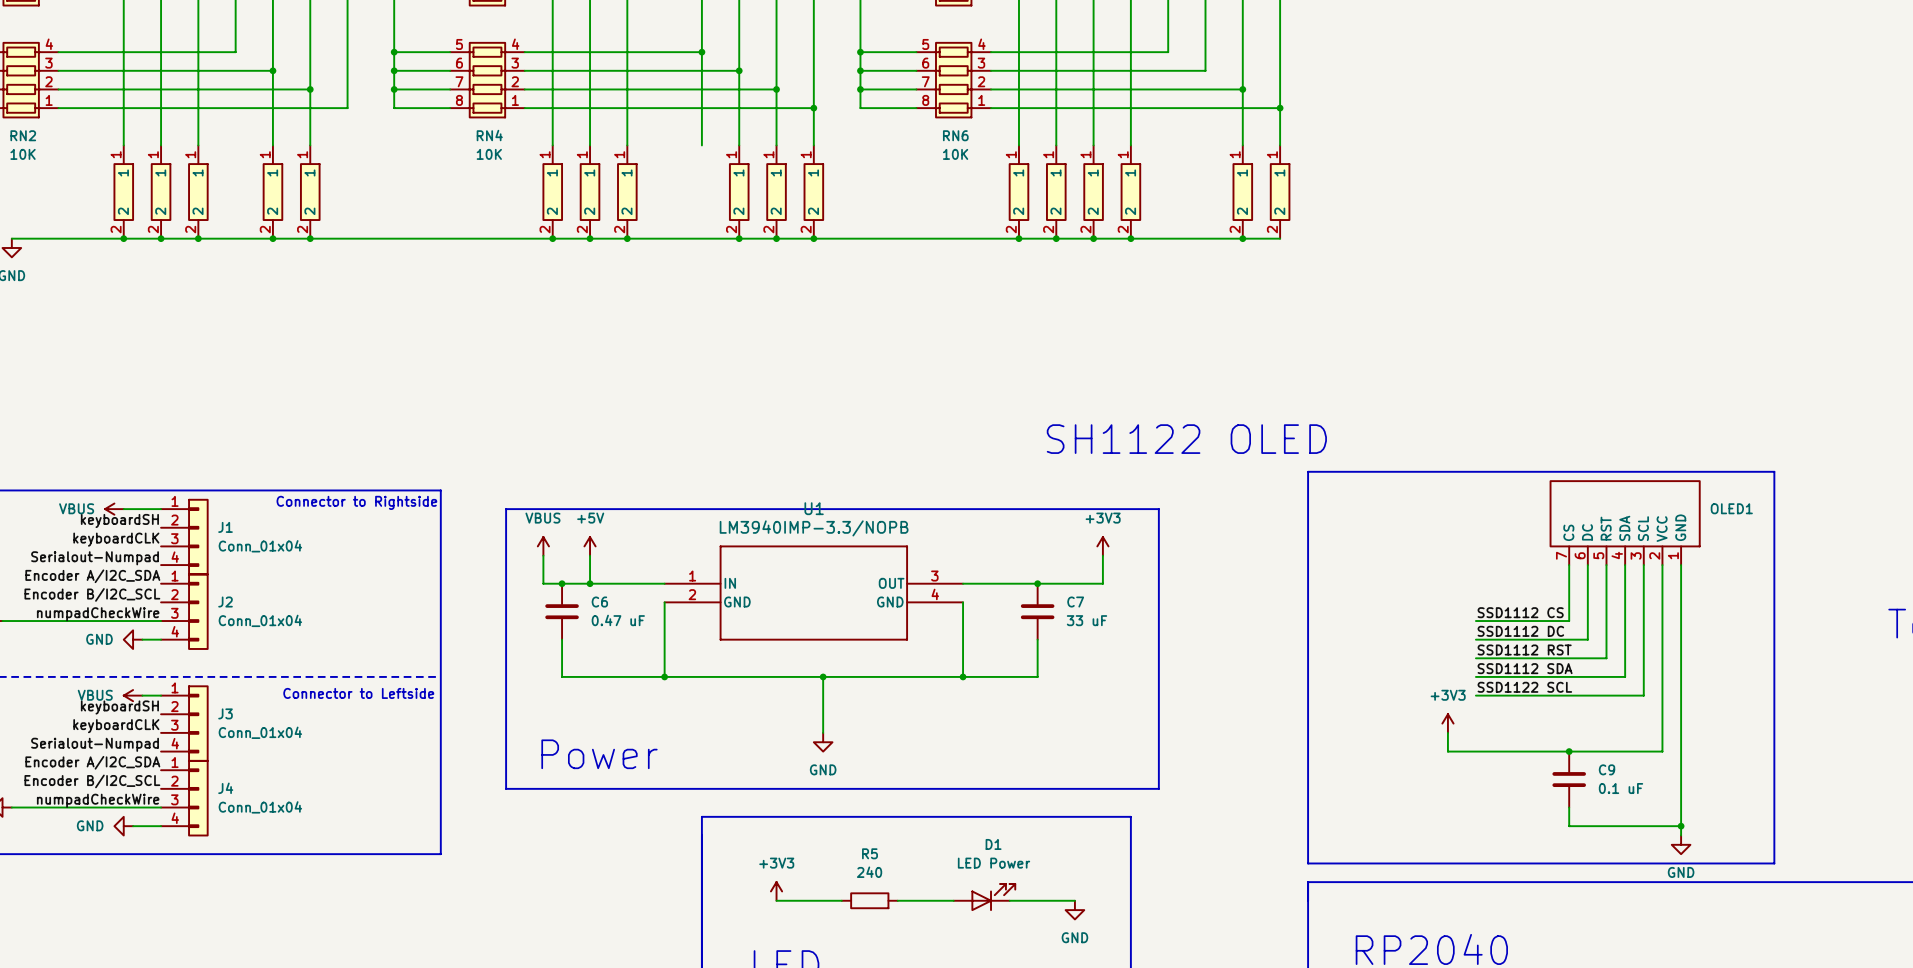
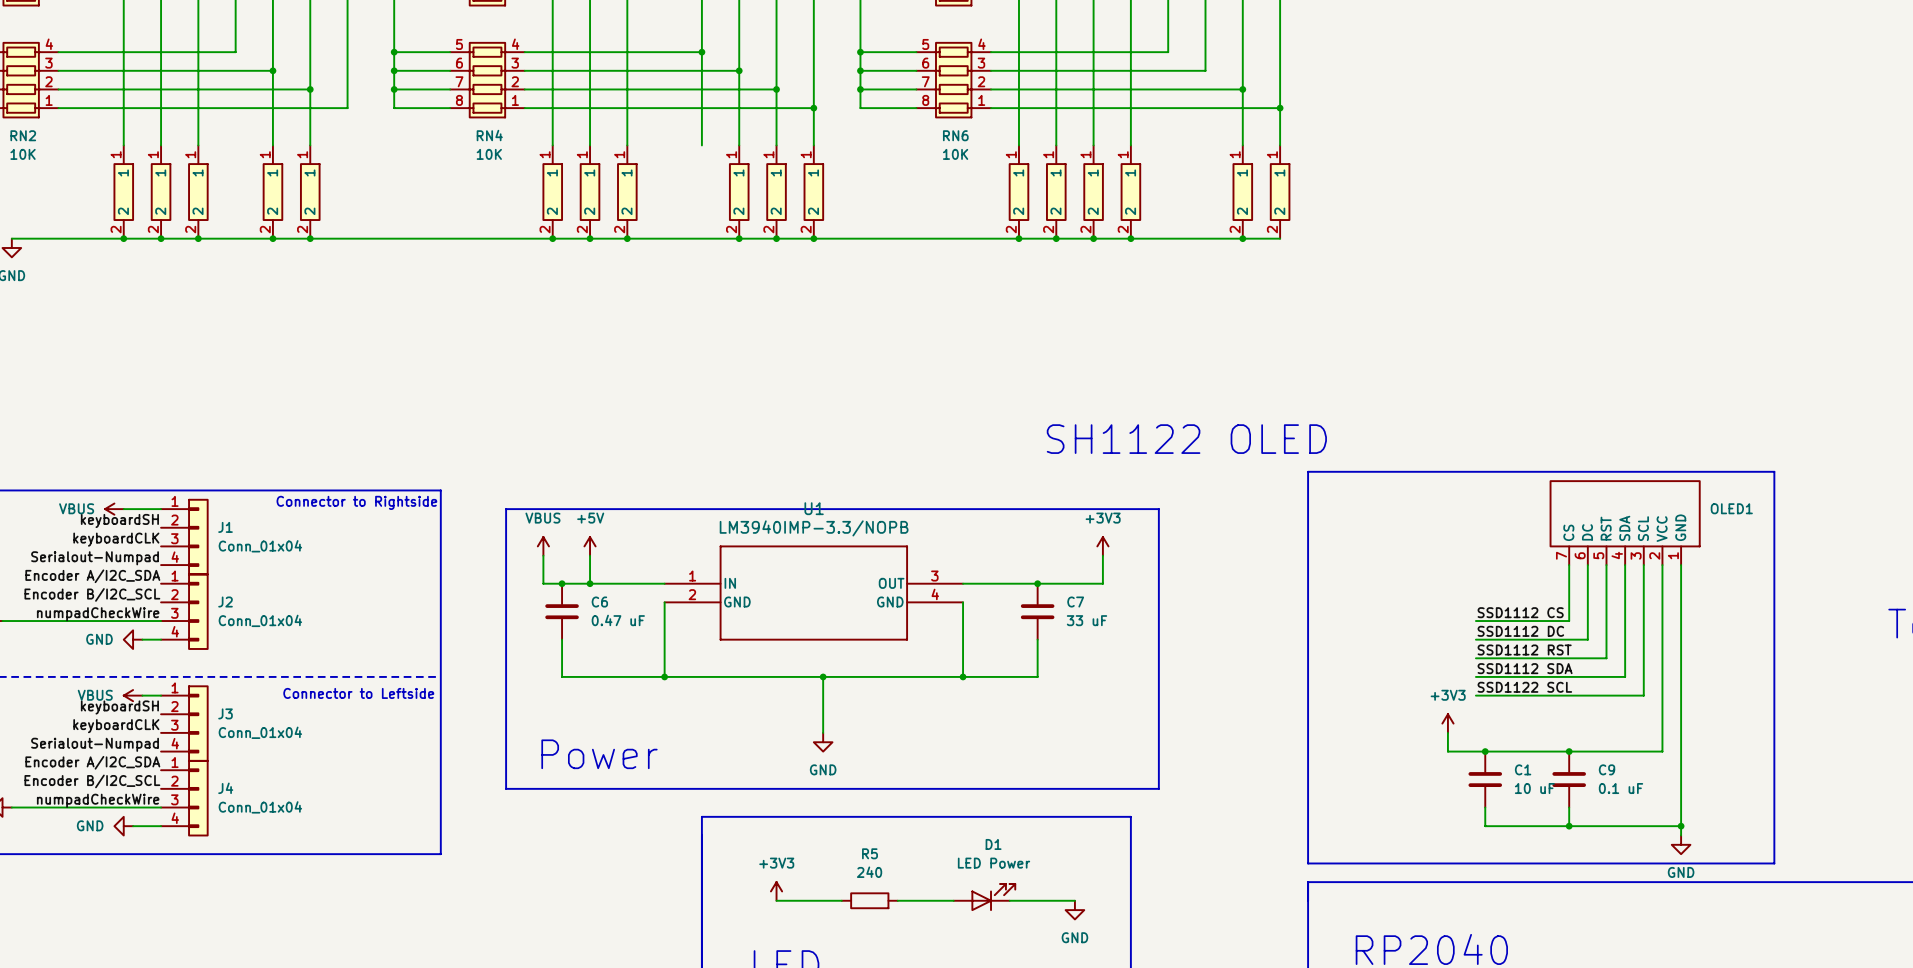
junction: none -> (1485, 751)
C1: none -> 10 uF (1485, 779)
wire: none -> (1485, 807) (1485, 826) (1569, 826)
junction: none -> (1569, 826)

